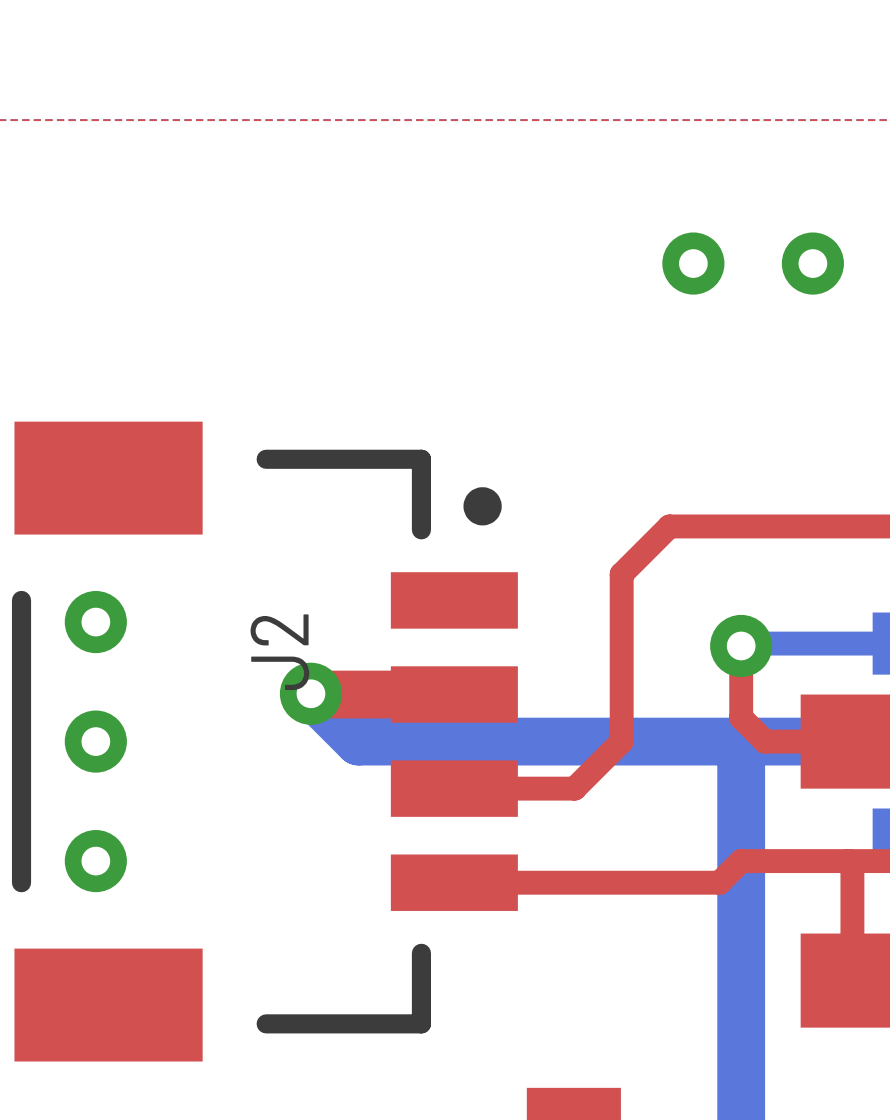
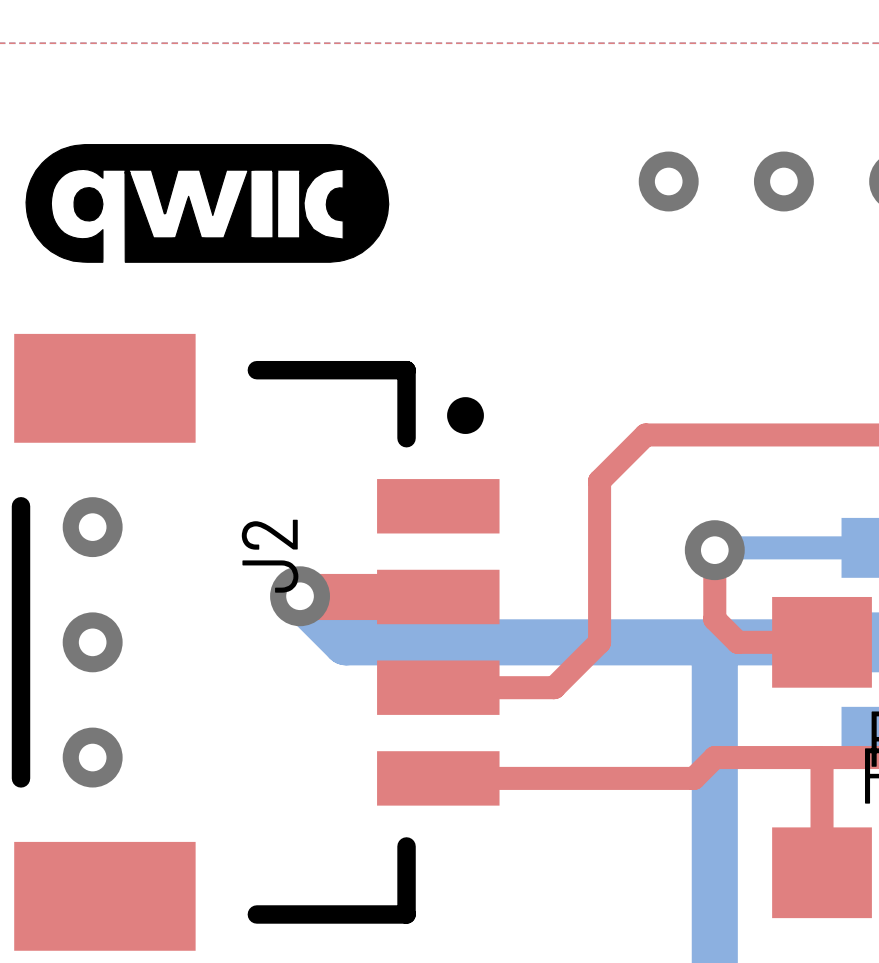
drawing: none -> [25, 144, 390, 263]

